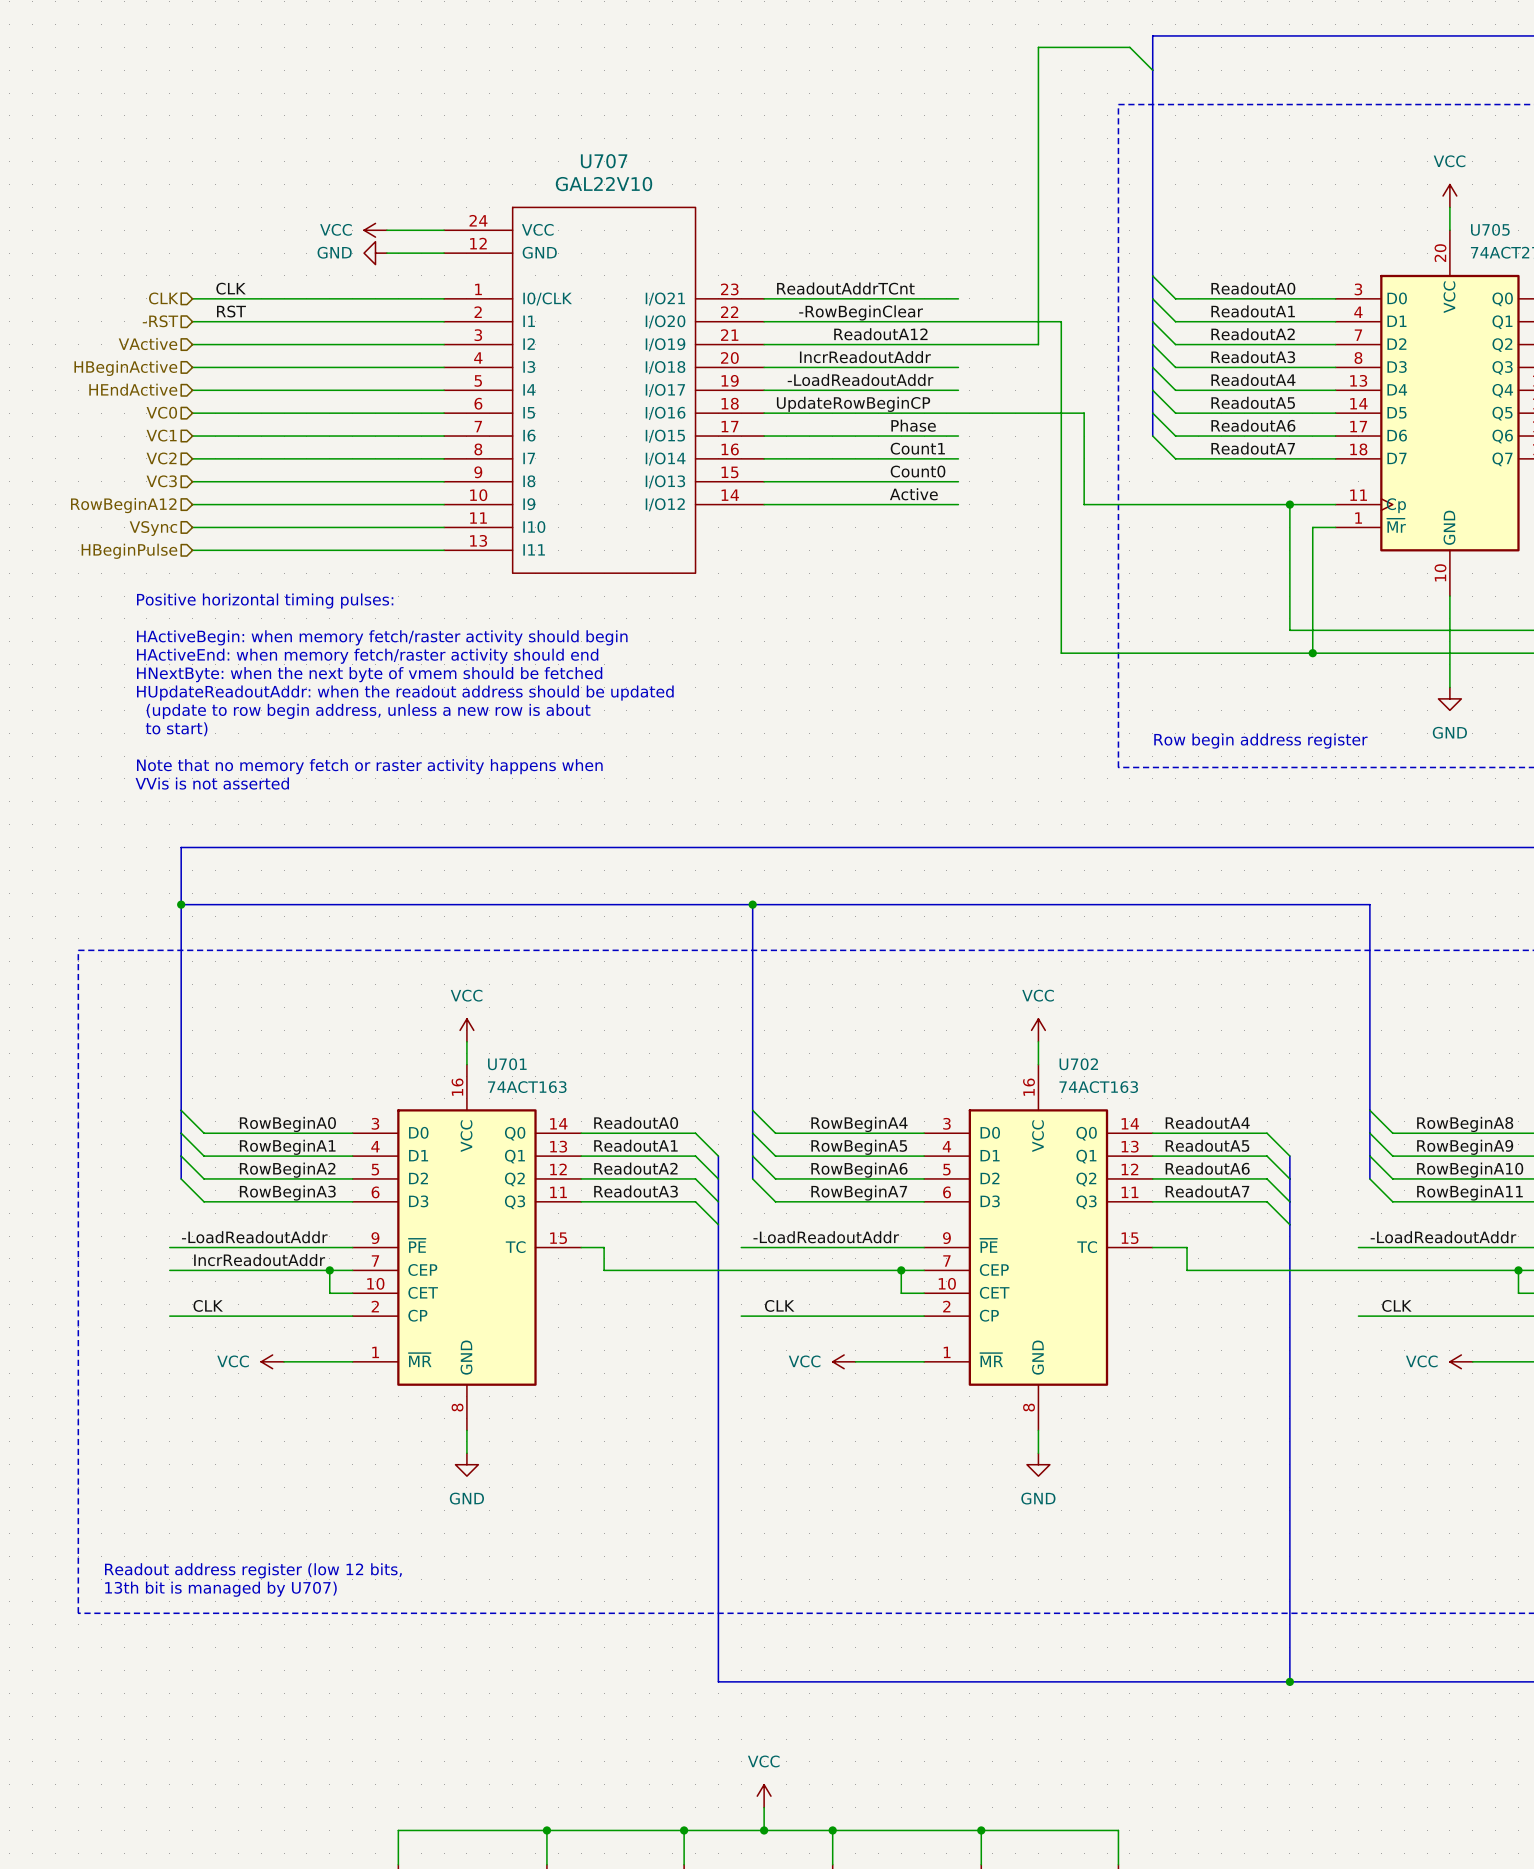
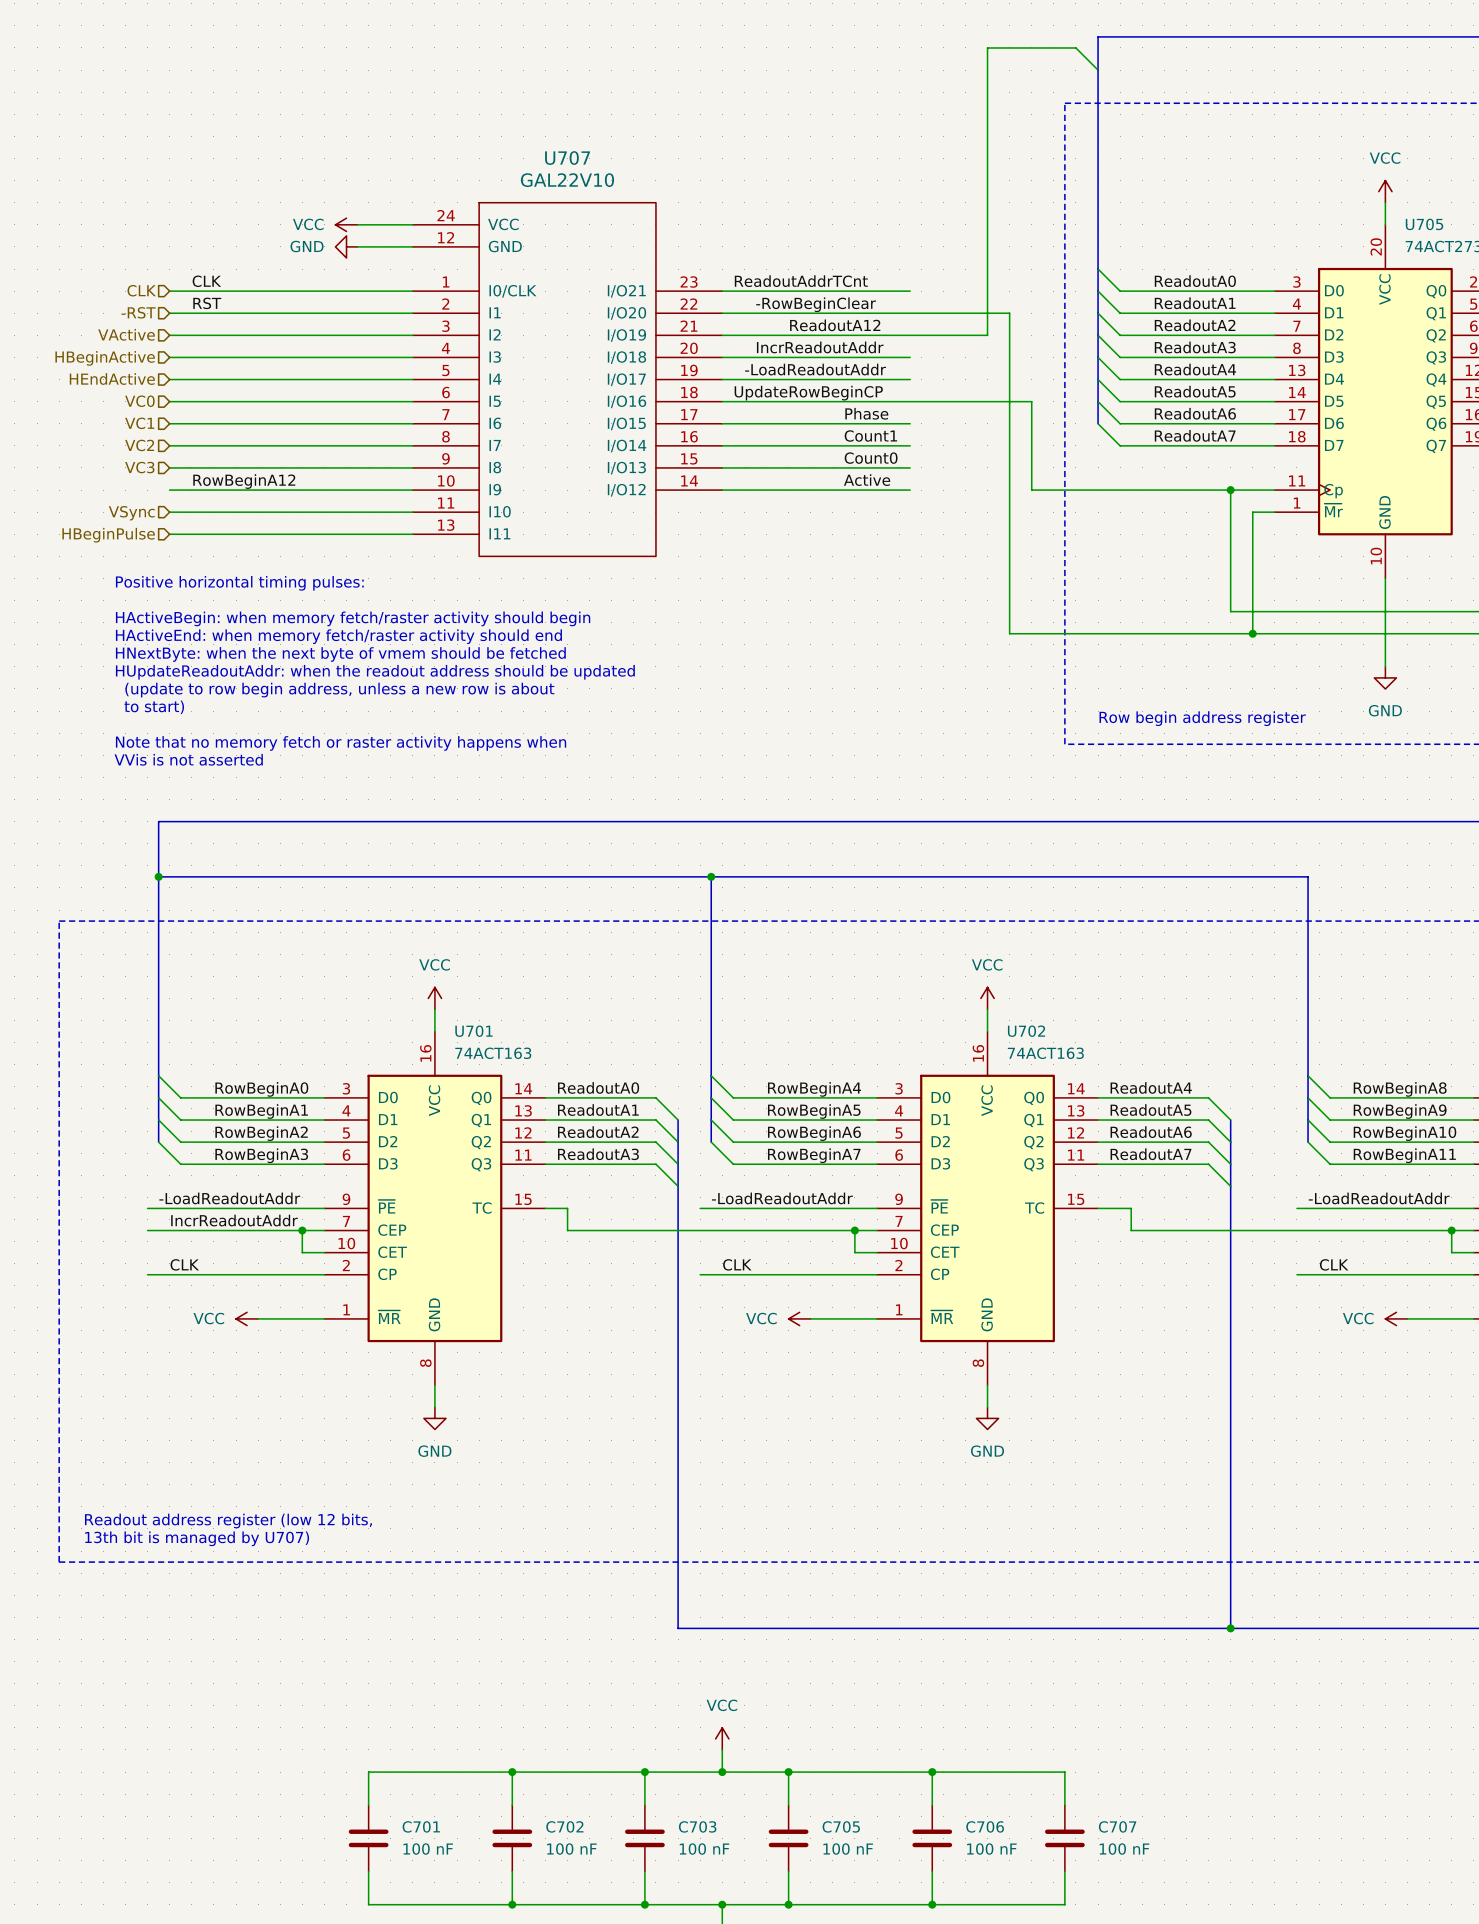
label: none -> RowBeginA12 (244, 481)
hierarchical label: RowBeginA12 (123, 505) -> none

